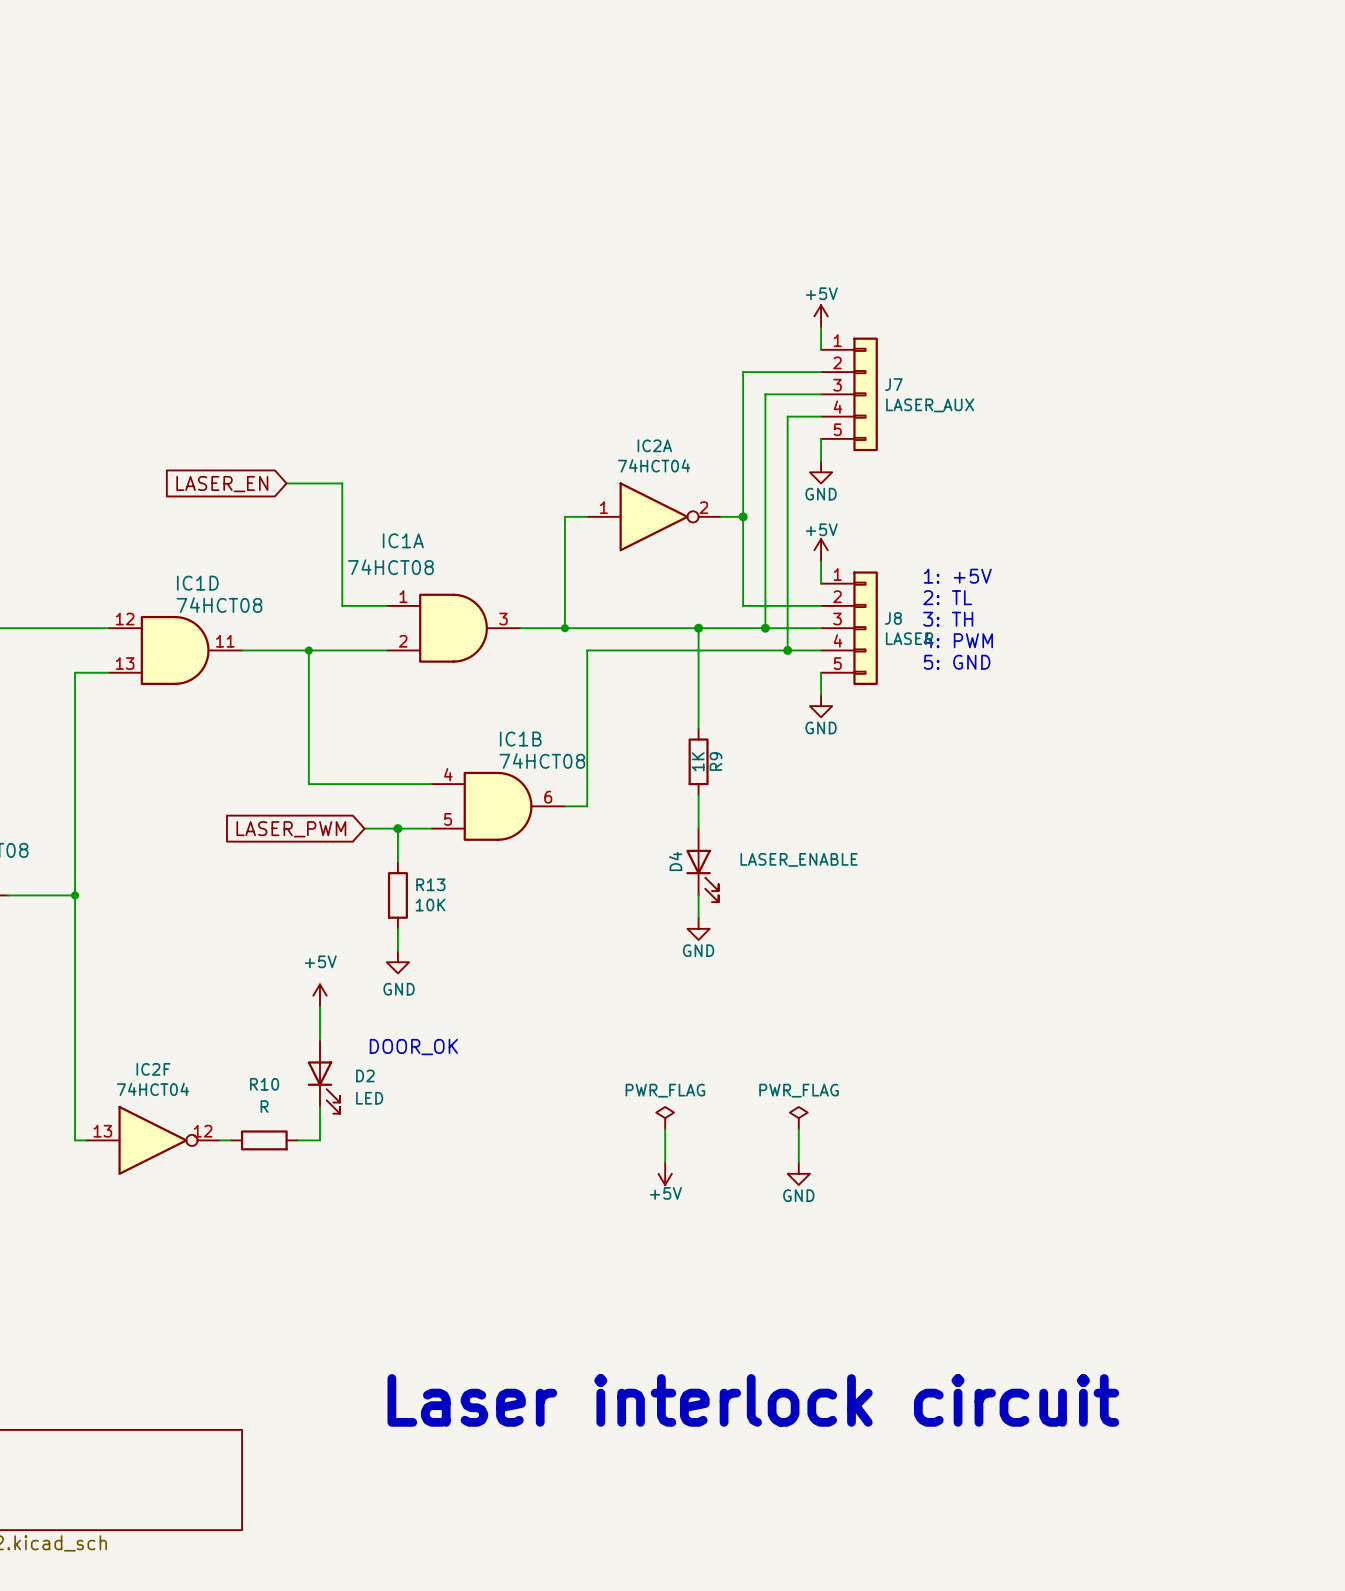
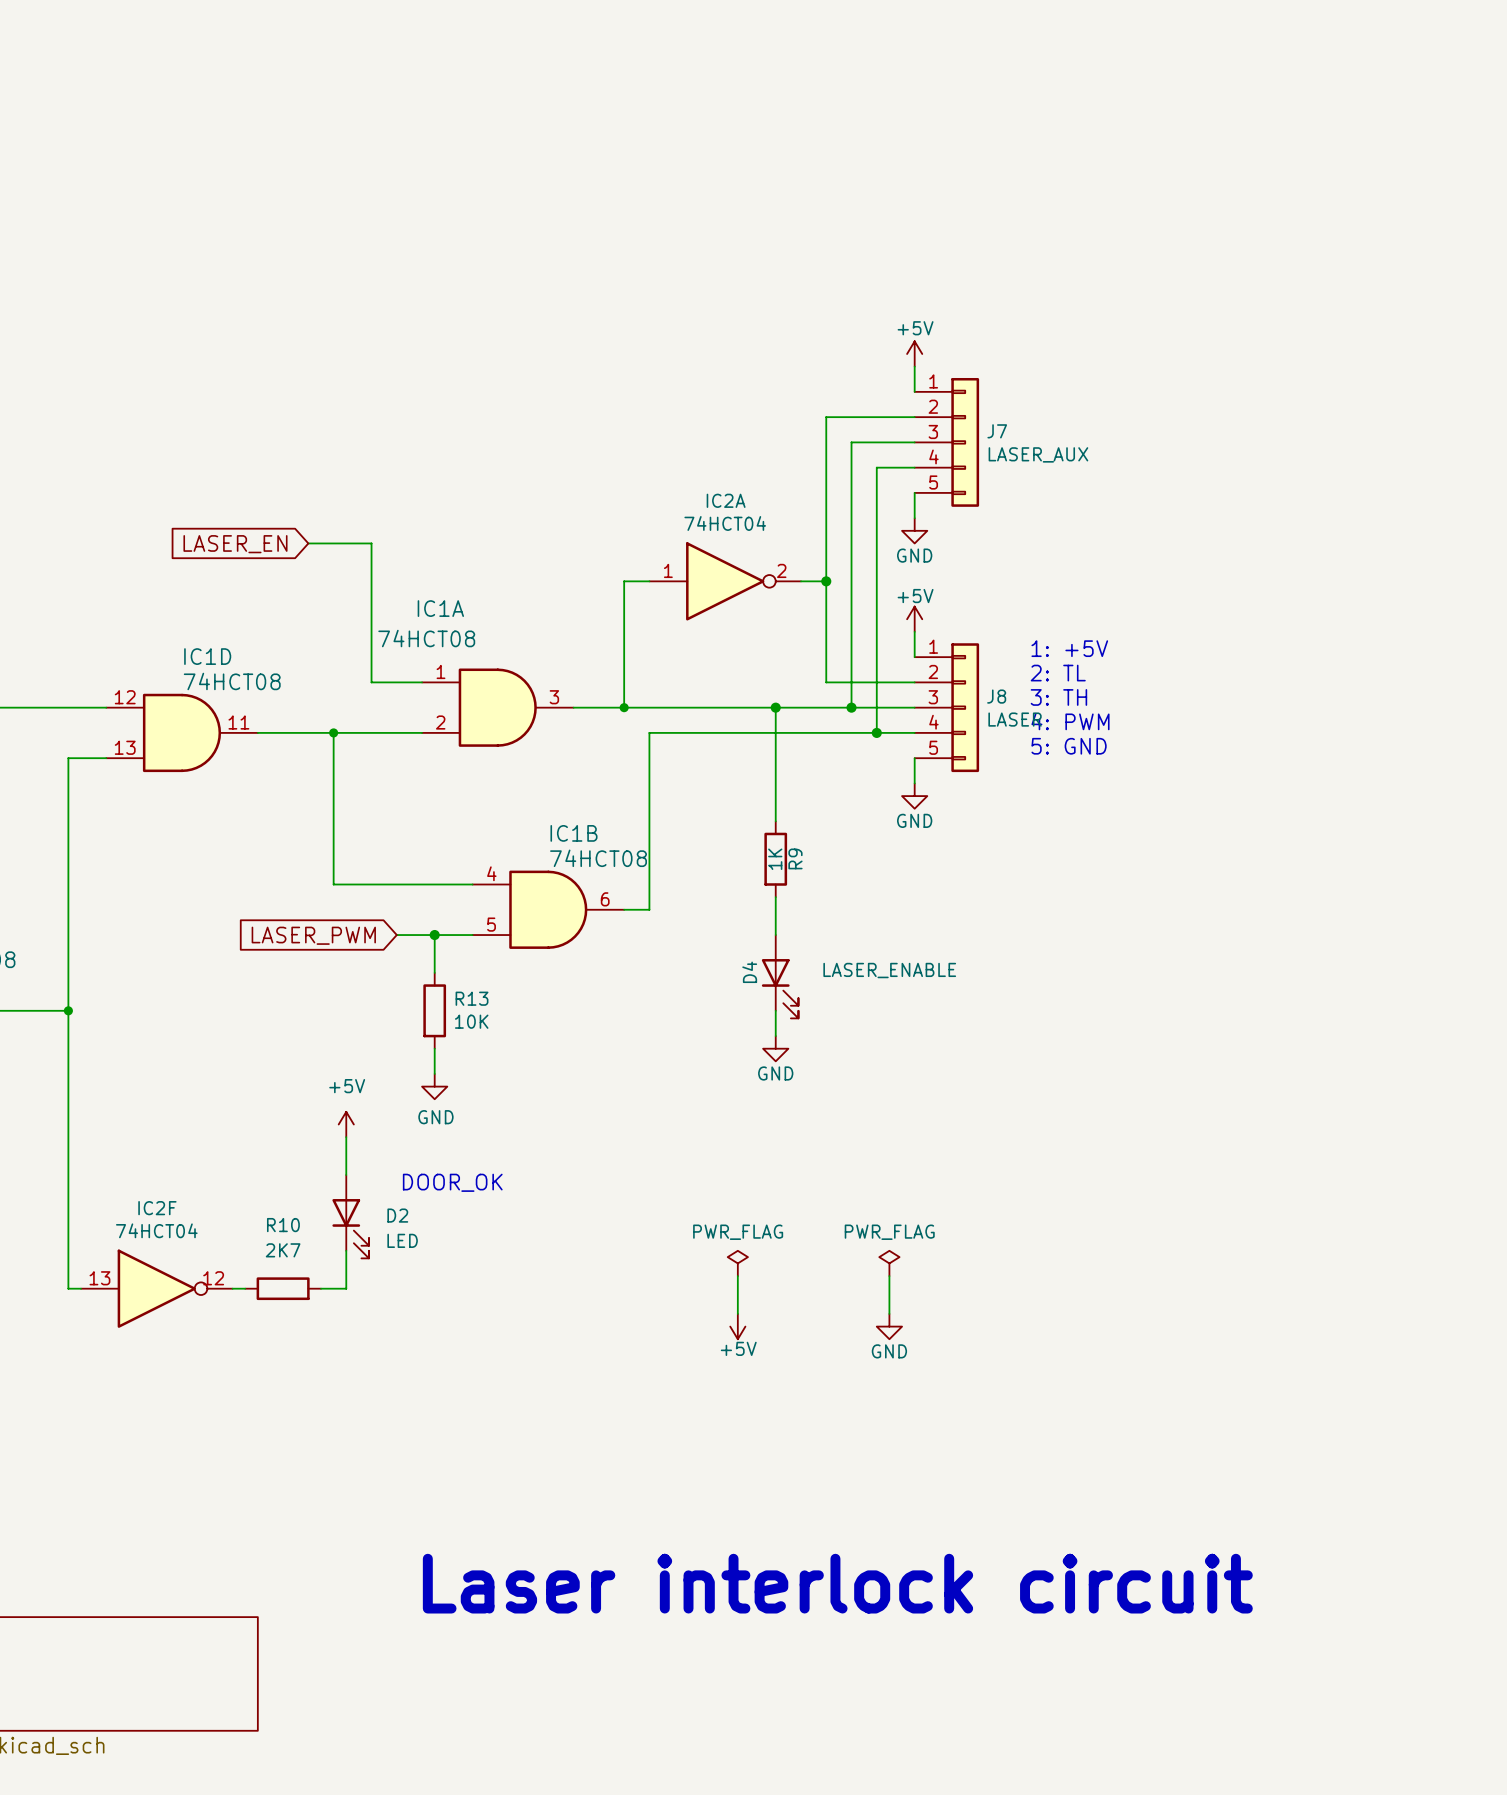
R10 value: R (264, 1106) -> 2K7 (283, 1250)

